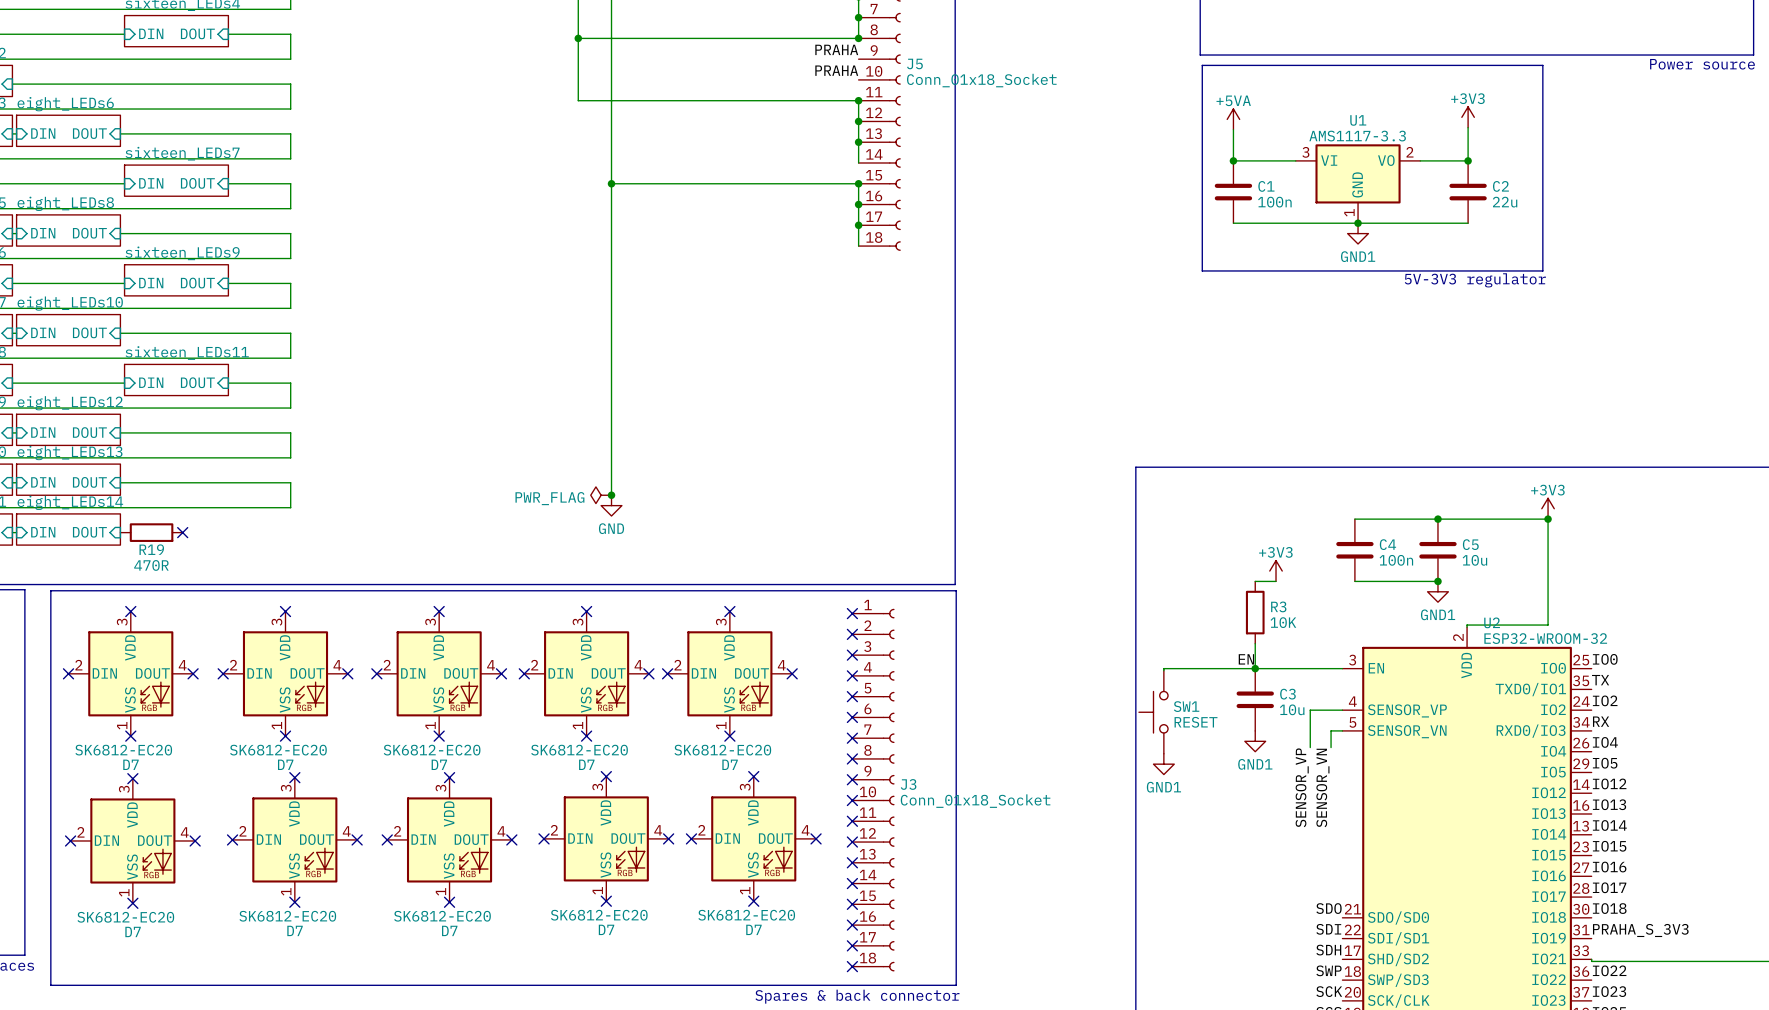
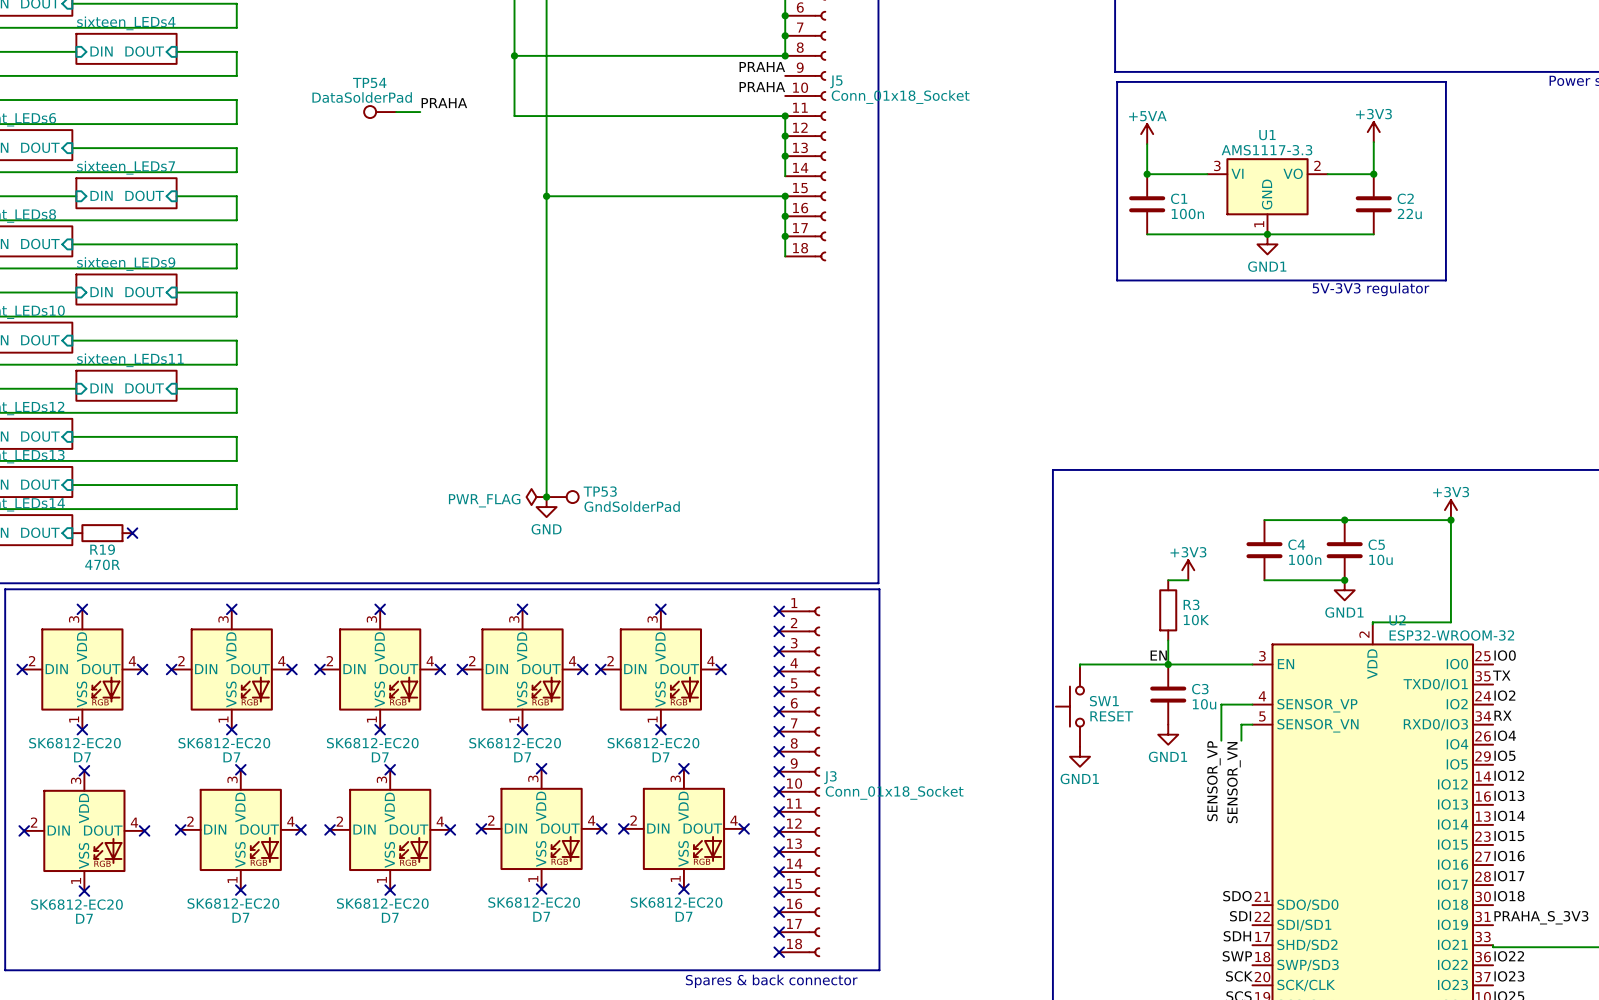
label: none -> PRAHA (444, 103)
TP54: none -> DataSolderPad (380, 112)
wire: none -> (396, 112) (420, 112)
TP53: none -> GndSolderPad (562, 497)

